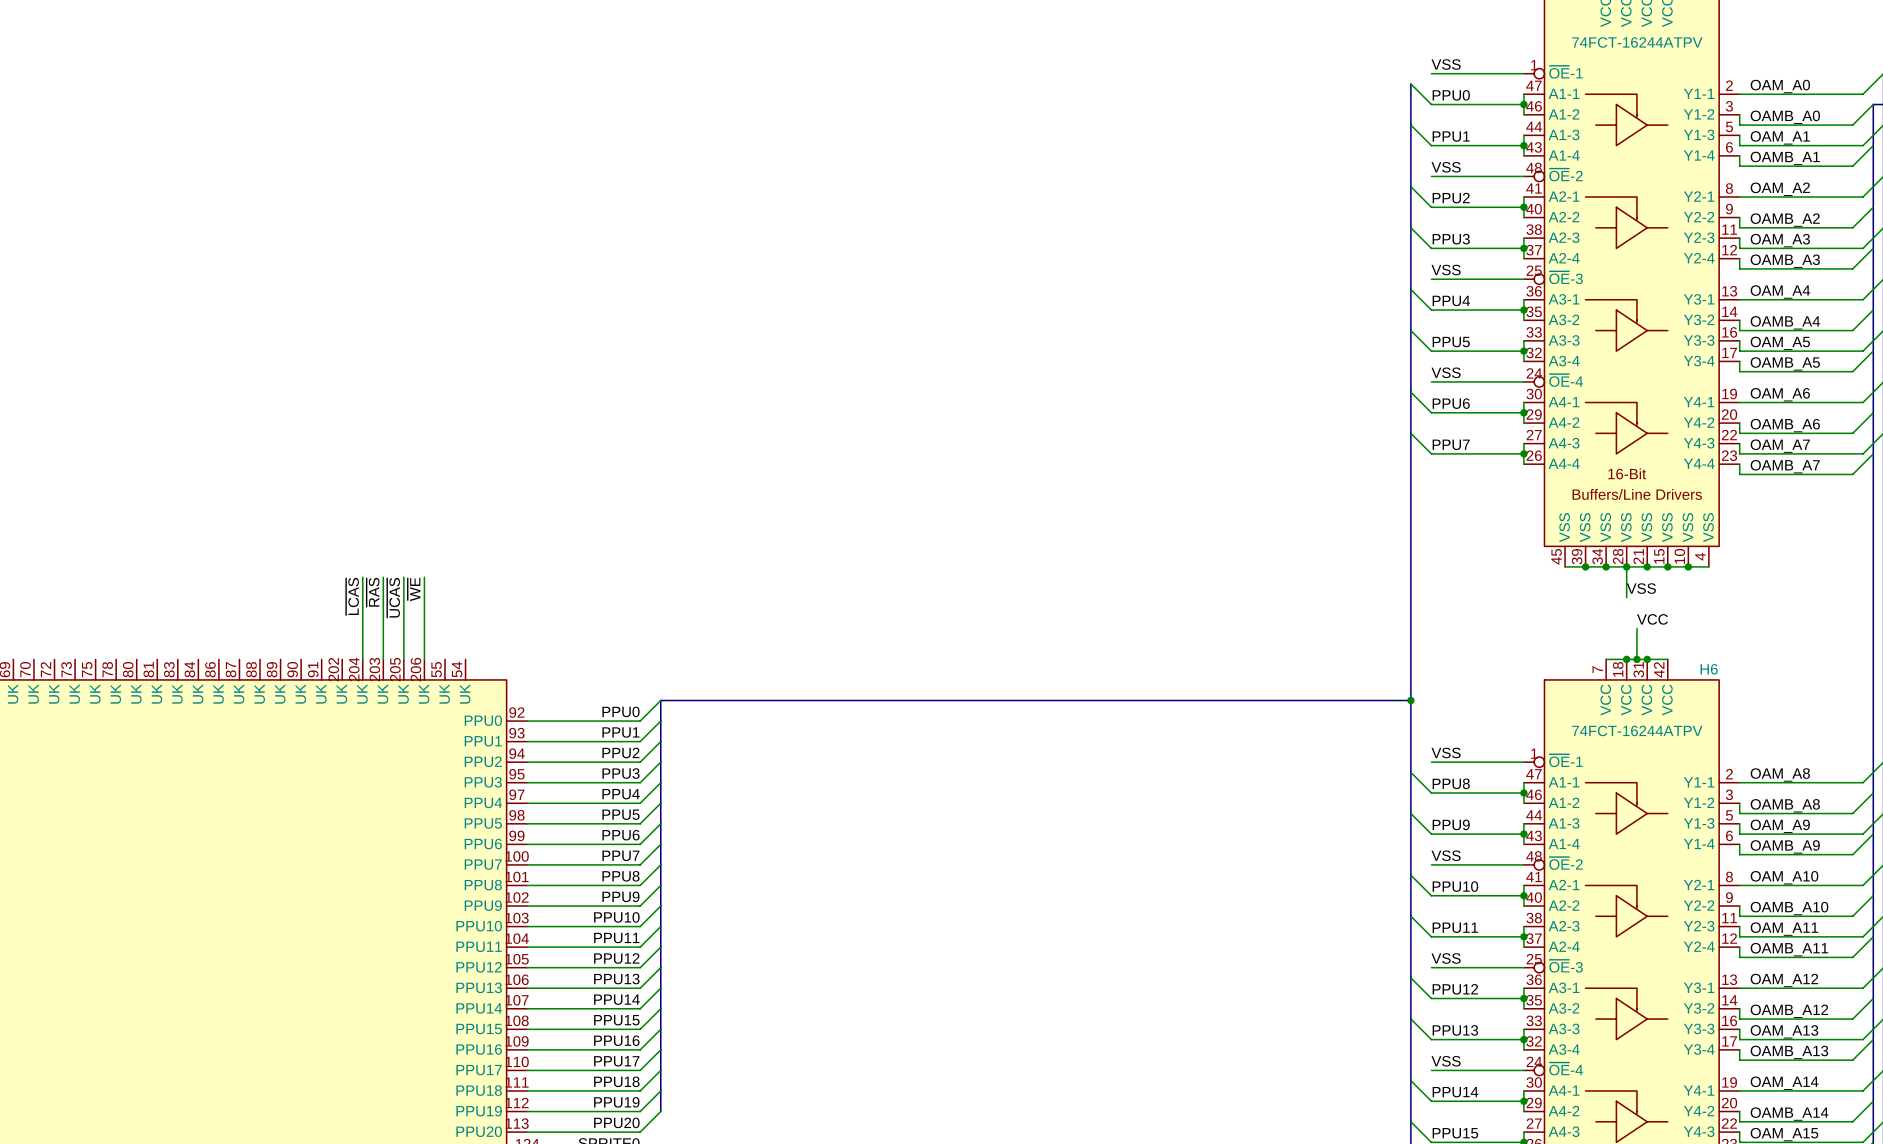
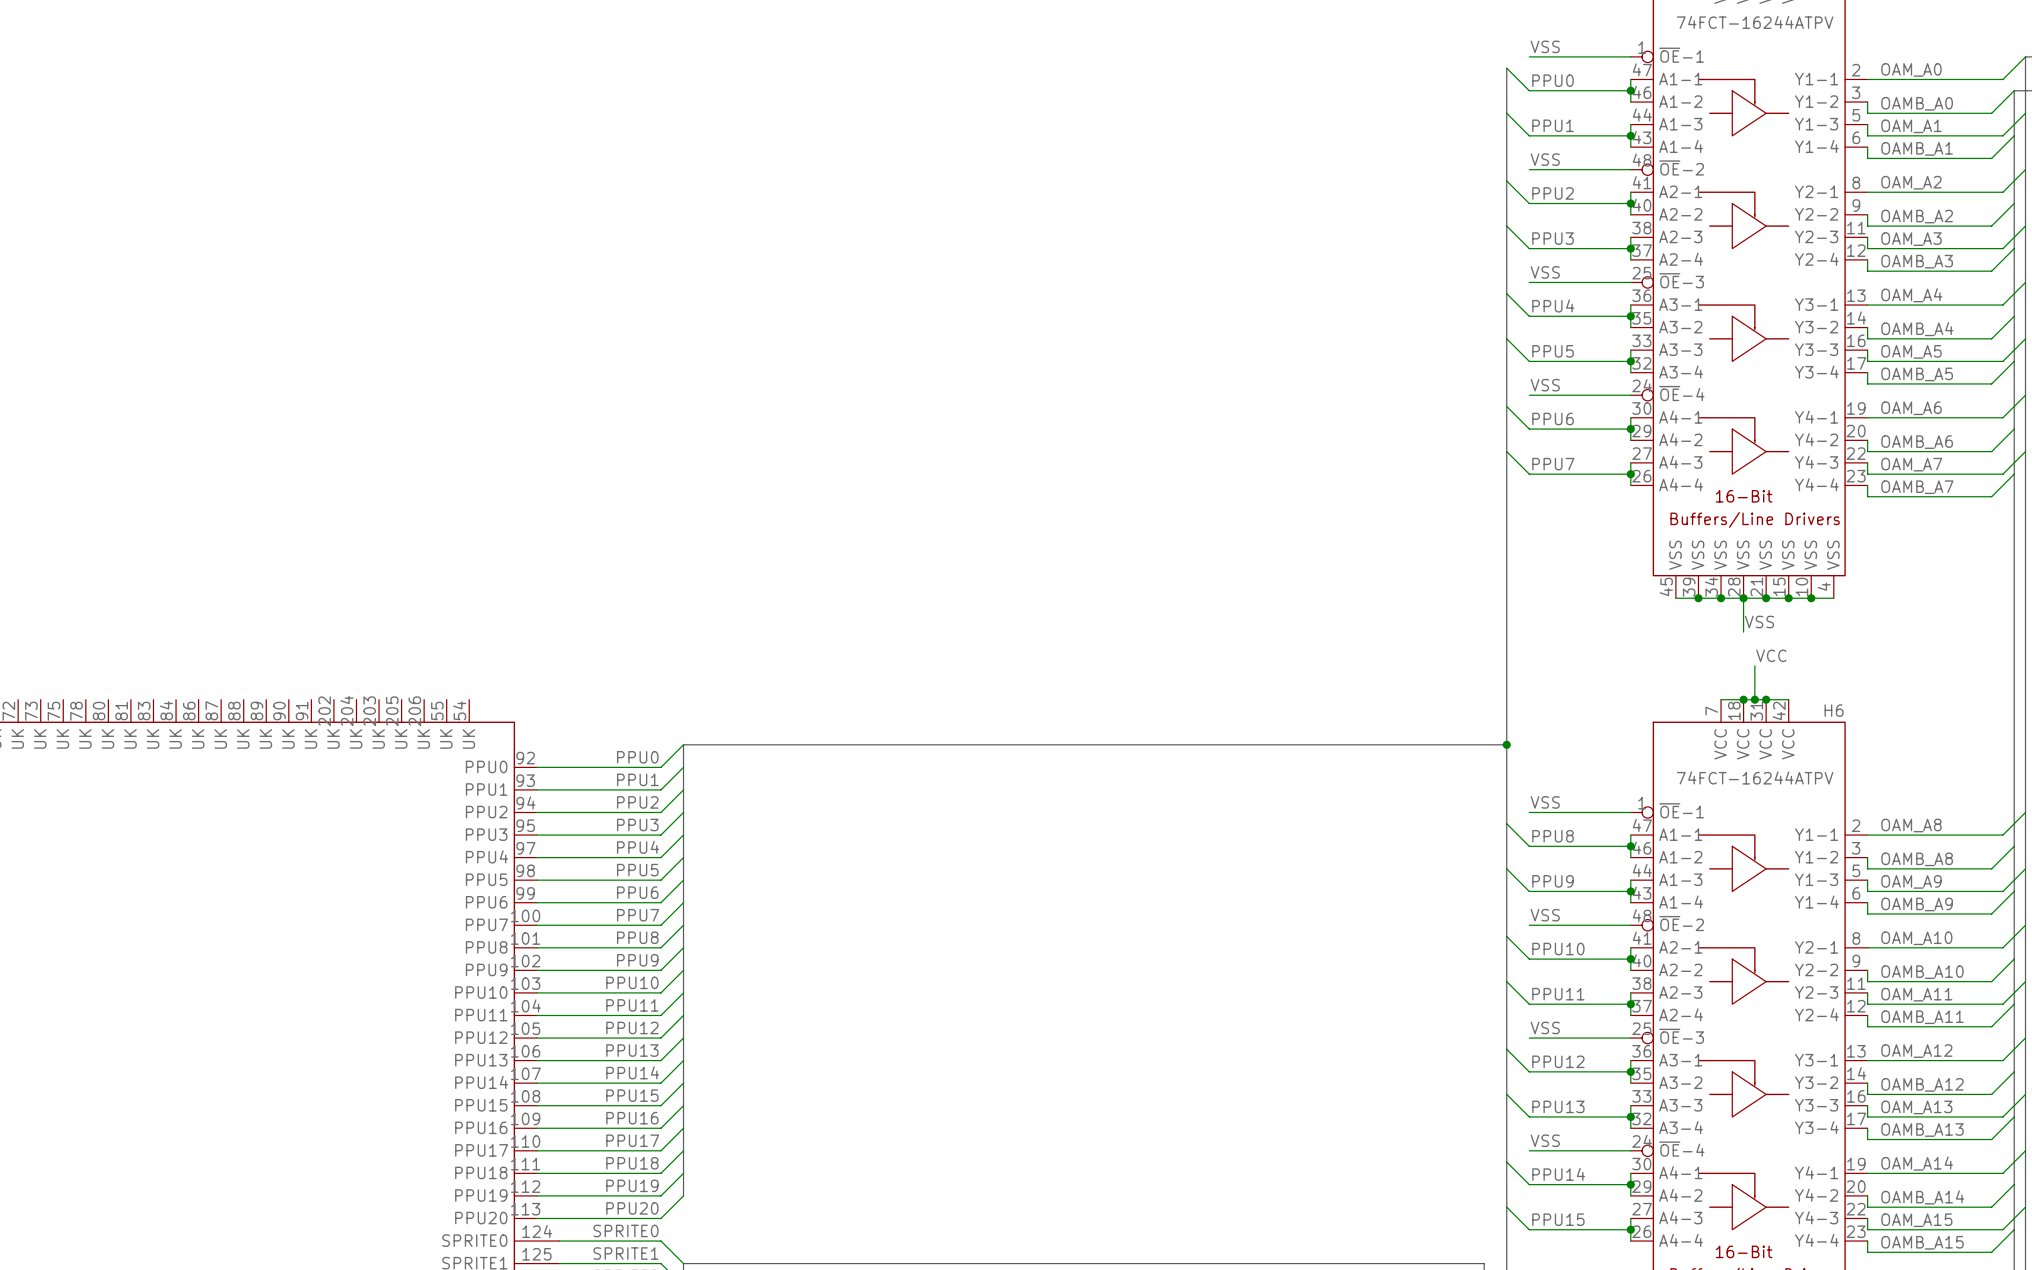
wire: (362, 577) (362, 659) -> none
wire: (383, 577) (383, 659) -> none
wire: (403, 577) (403, 659) -> none
wire: (424, 577) (424, 659) -> none
label: ~{WE} (414, 589) -> none
label: ~{RAS} (373, 592) -> none
label: ~{LCAS} (352, 596) -> none
label: ~{UCAS} (393, 597) -> none

